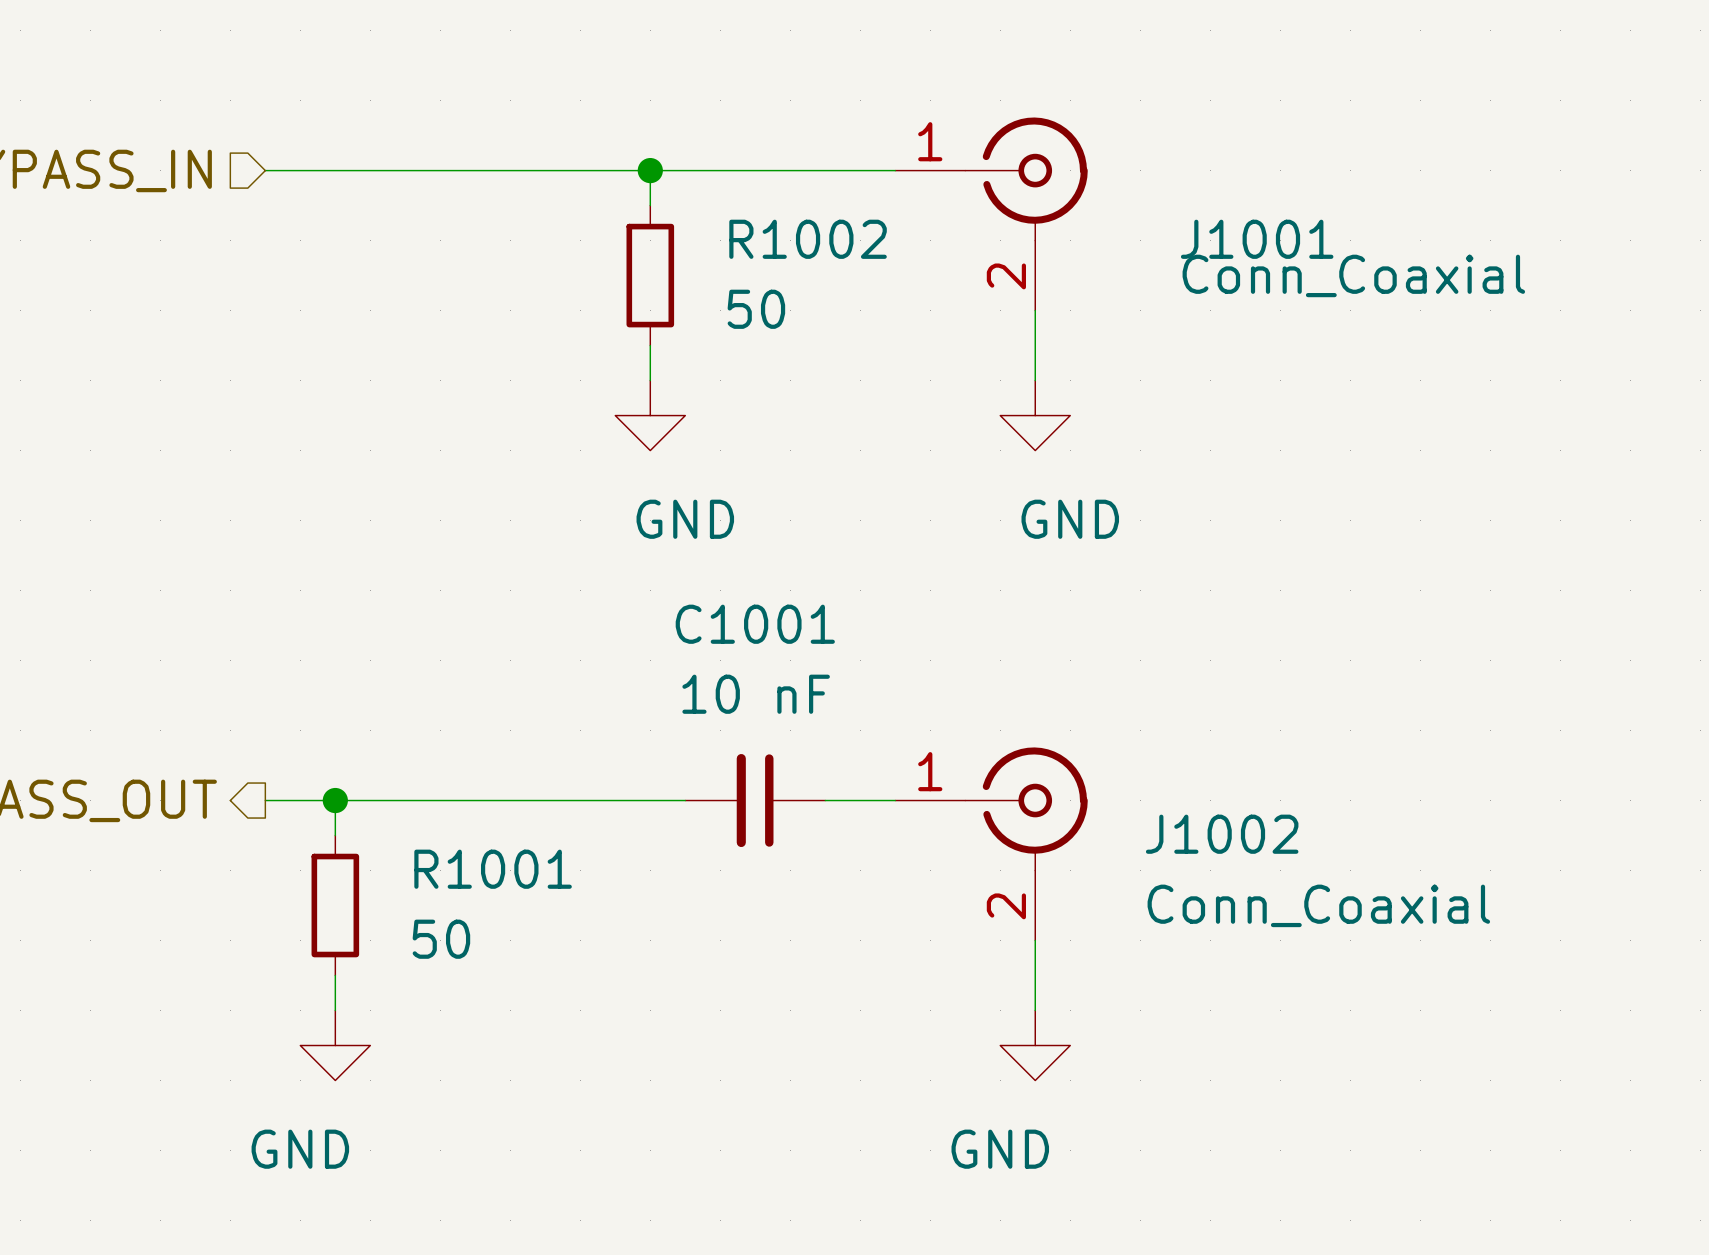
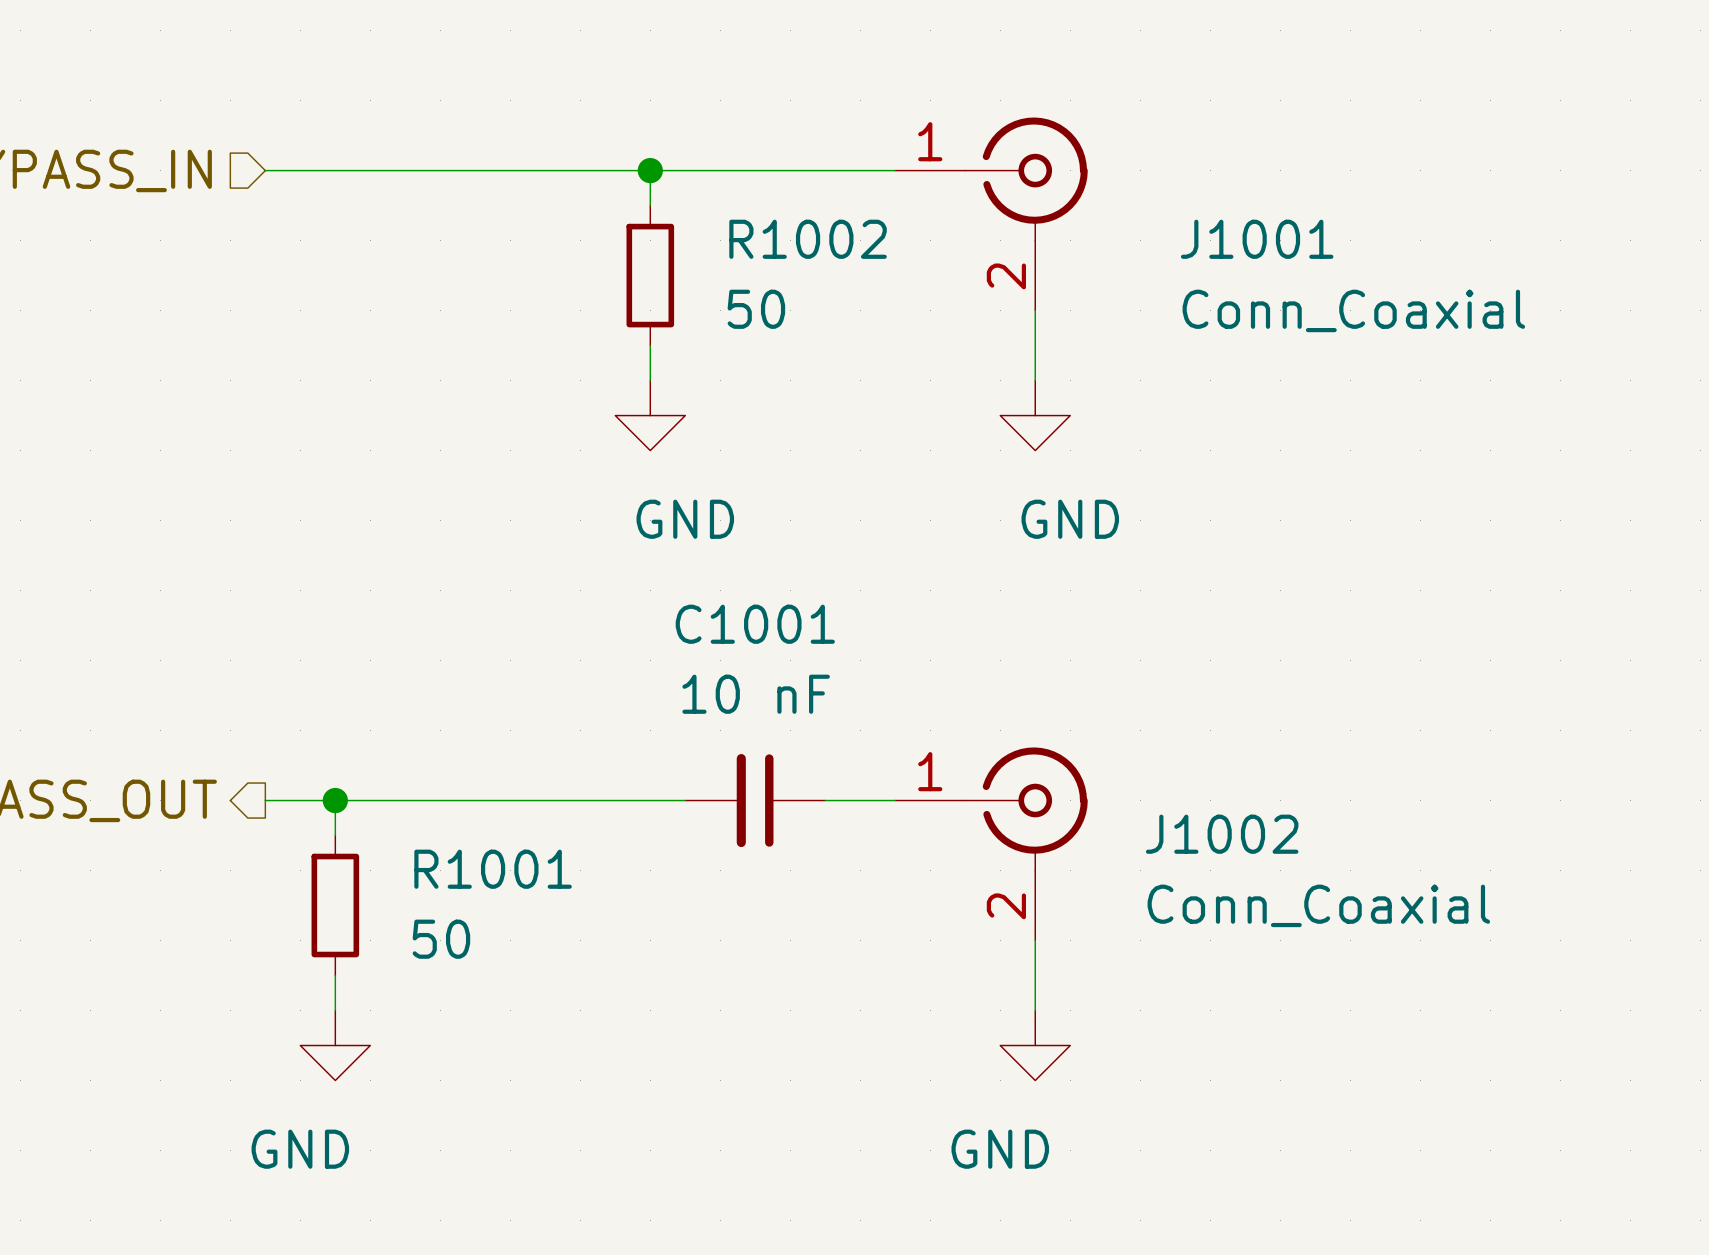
J1001 value position: Conn_Coaxial (1353, 275) -> Conn_Coaxial (1353, 310)

